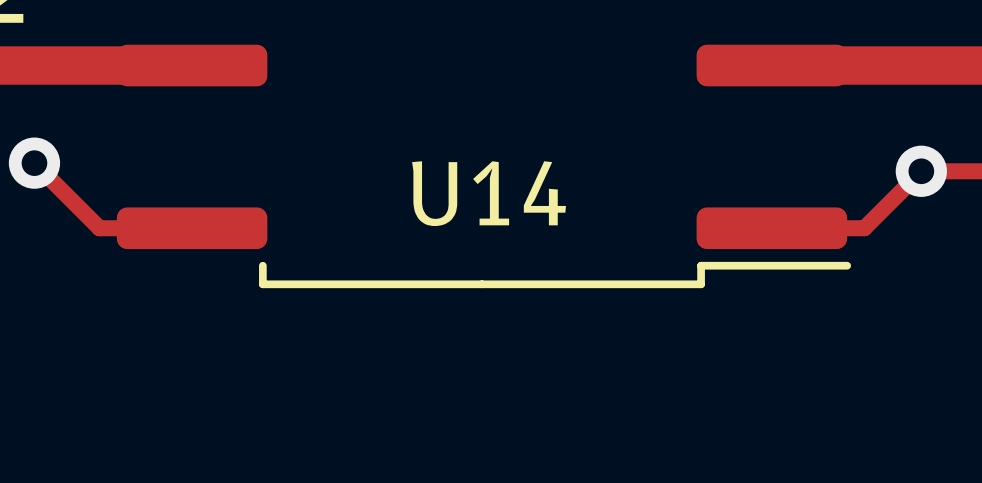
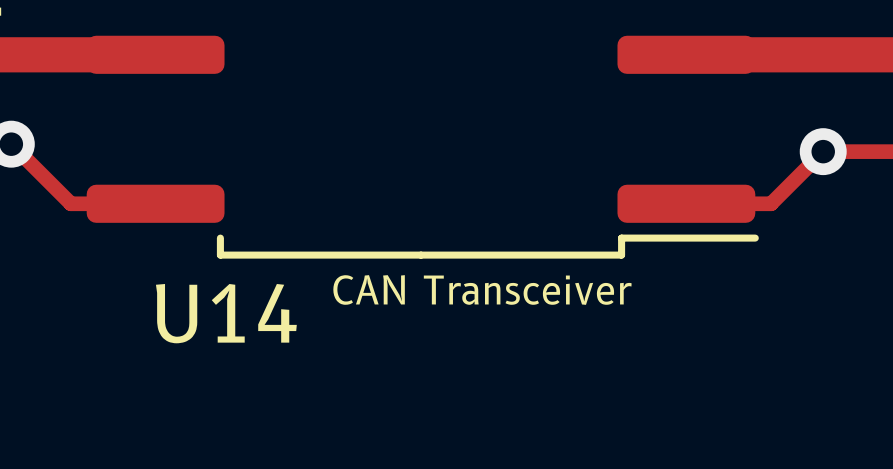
U14 name position: U14 (489, 193) -> U14 (226, 313)
text: none -> CAN Transceiver (482, 290)

